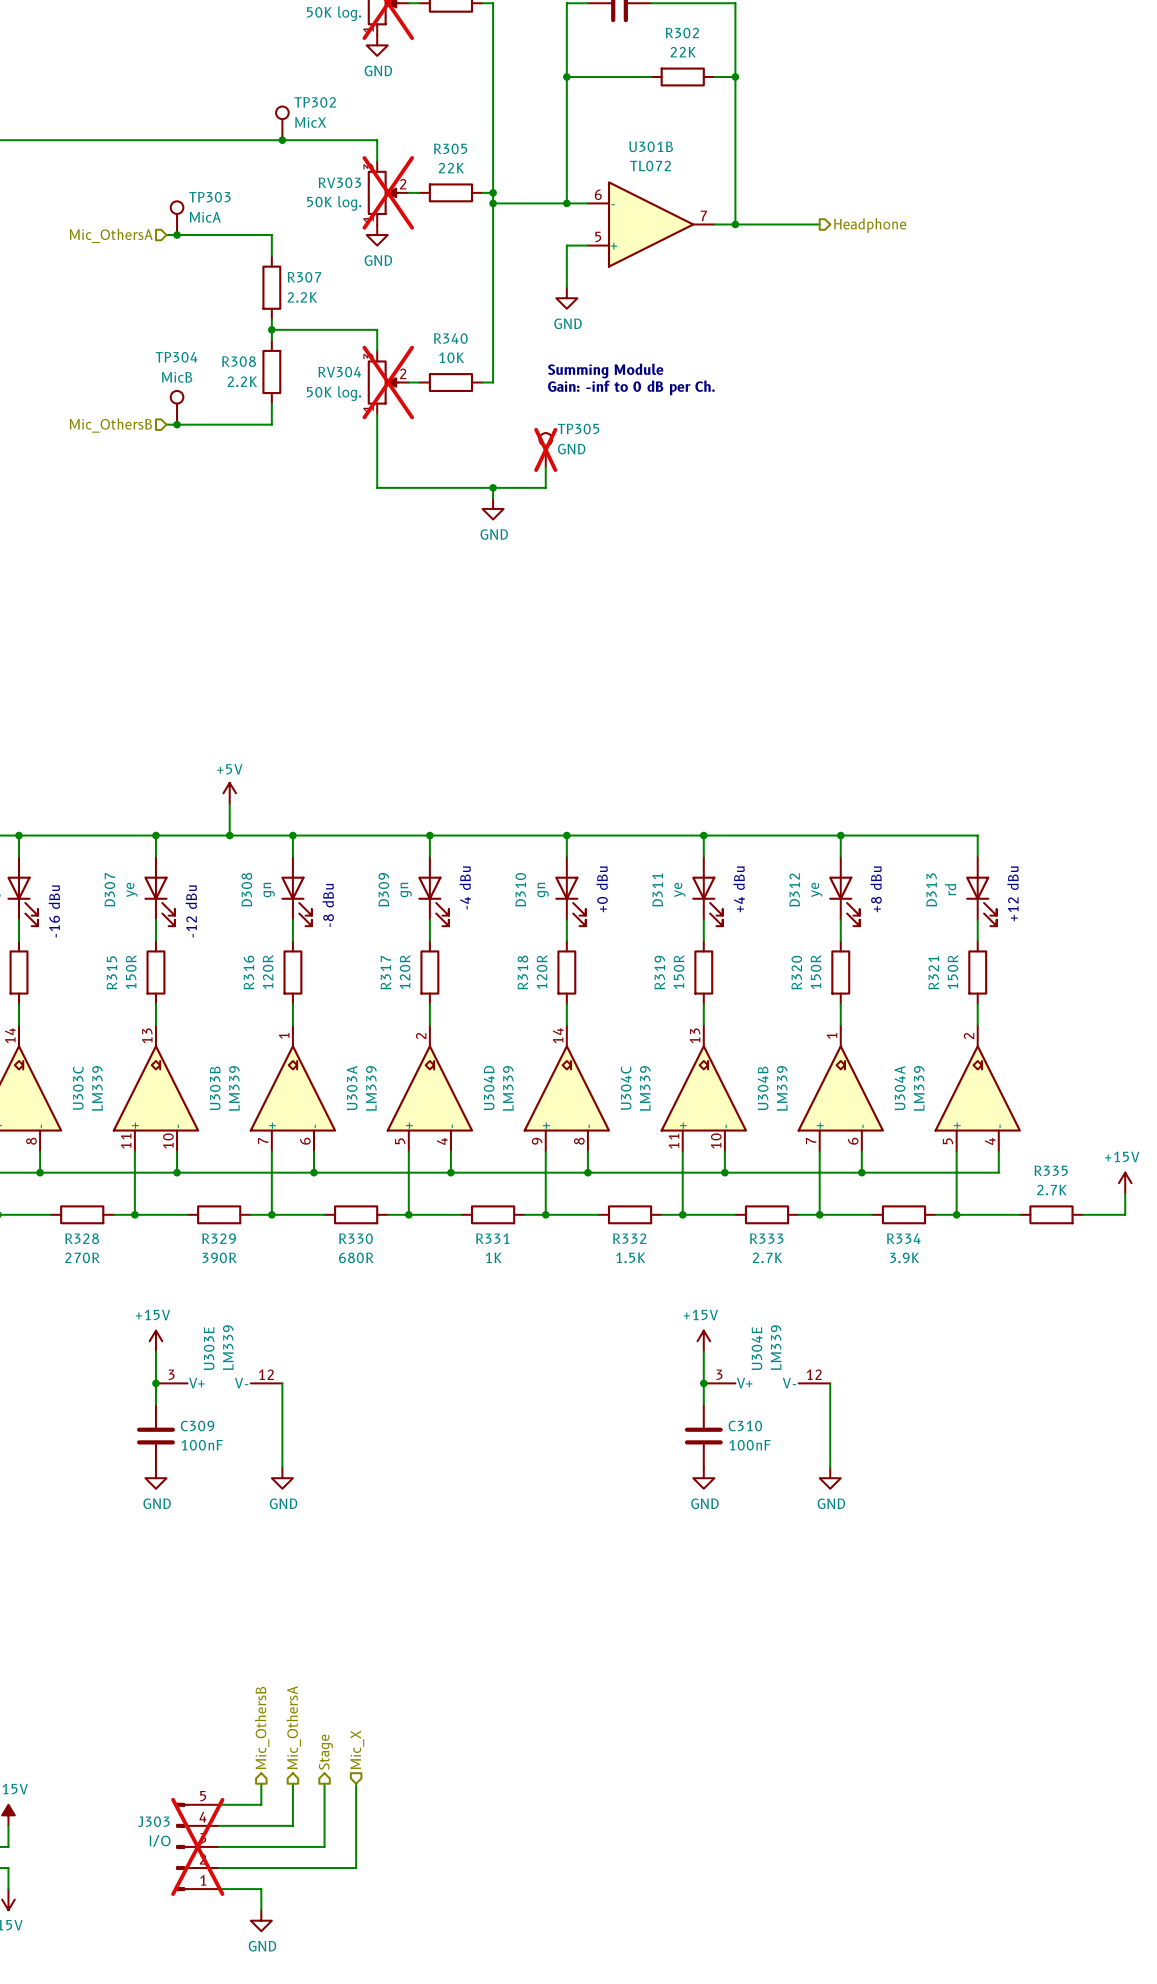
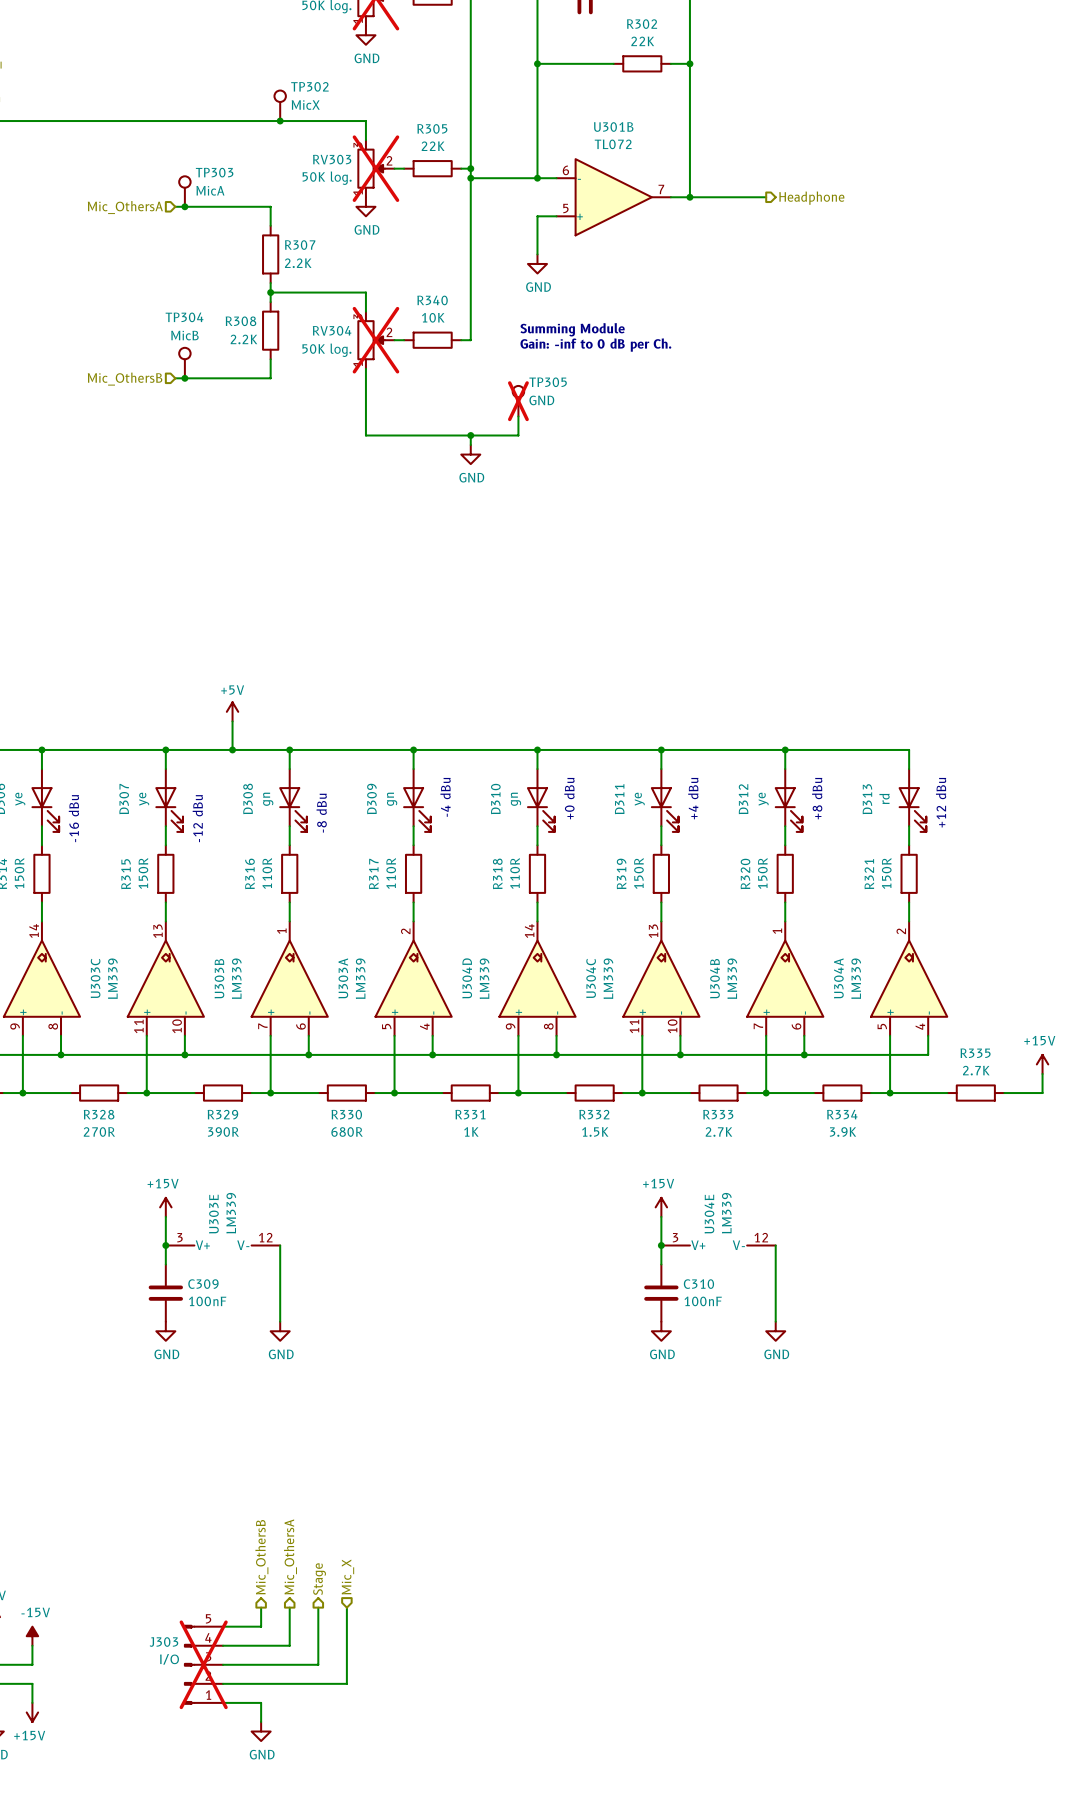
R316 value: 120R (268, 972) -> 110R (267, 873)
R317 value: 120R (405, 972) -> 110R (391, 873)
R318 value: 120R (542, 972) -> 110R (515, 873)

